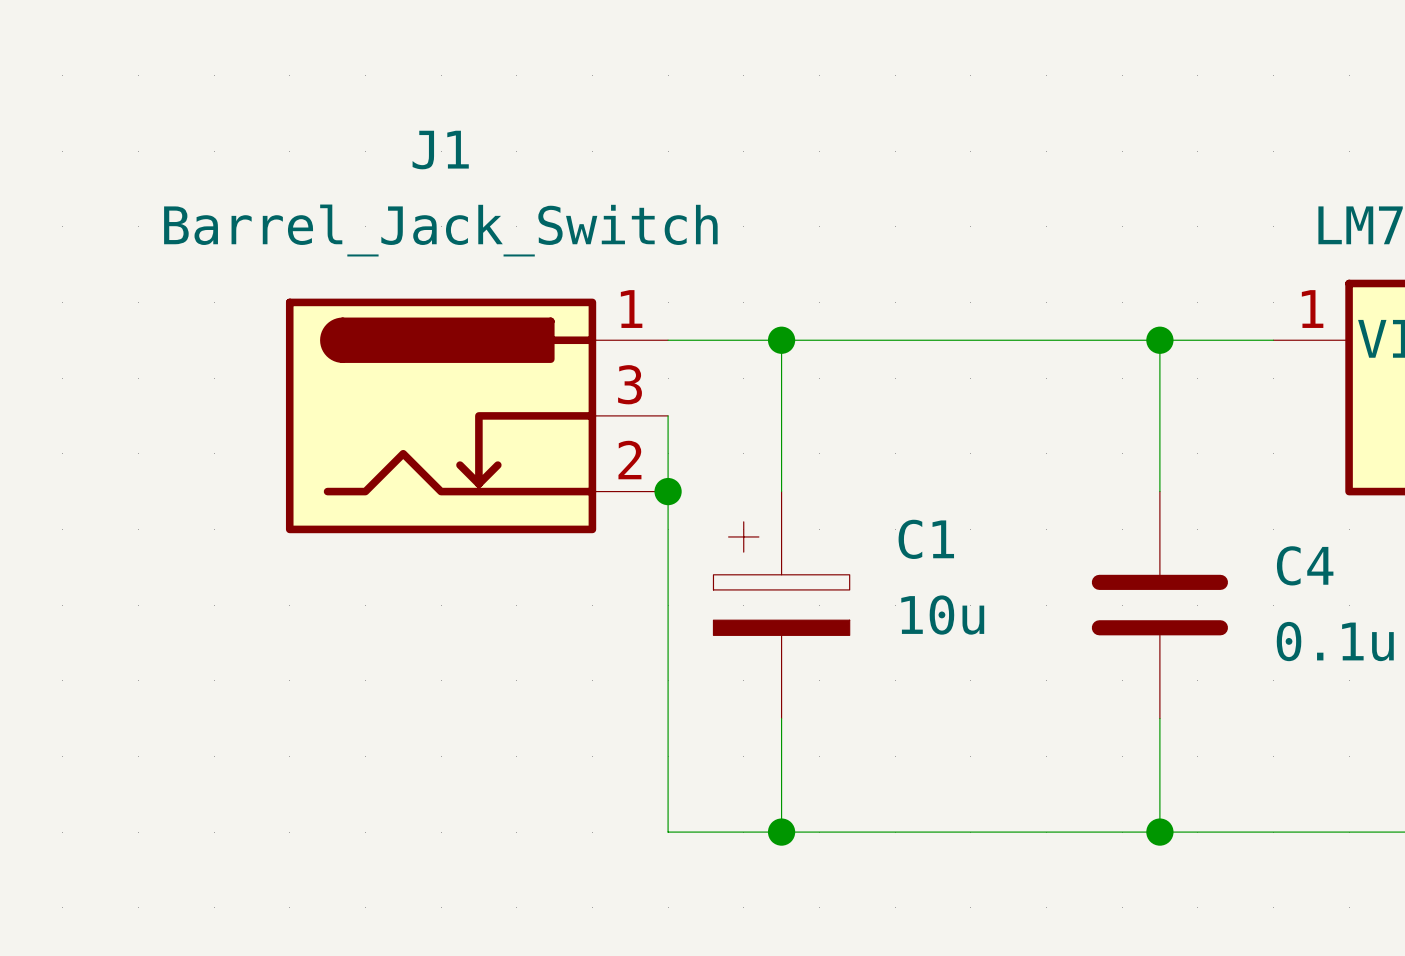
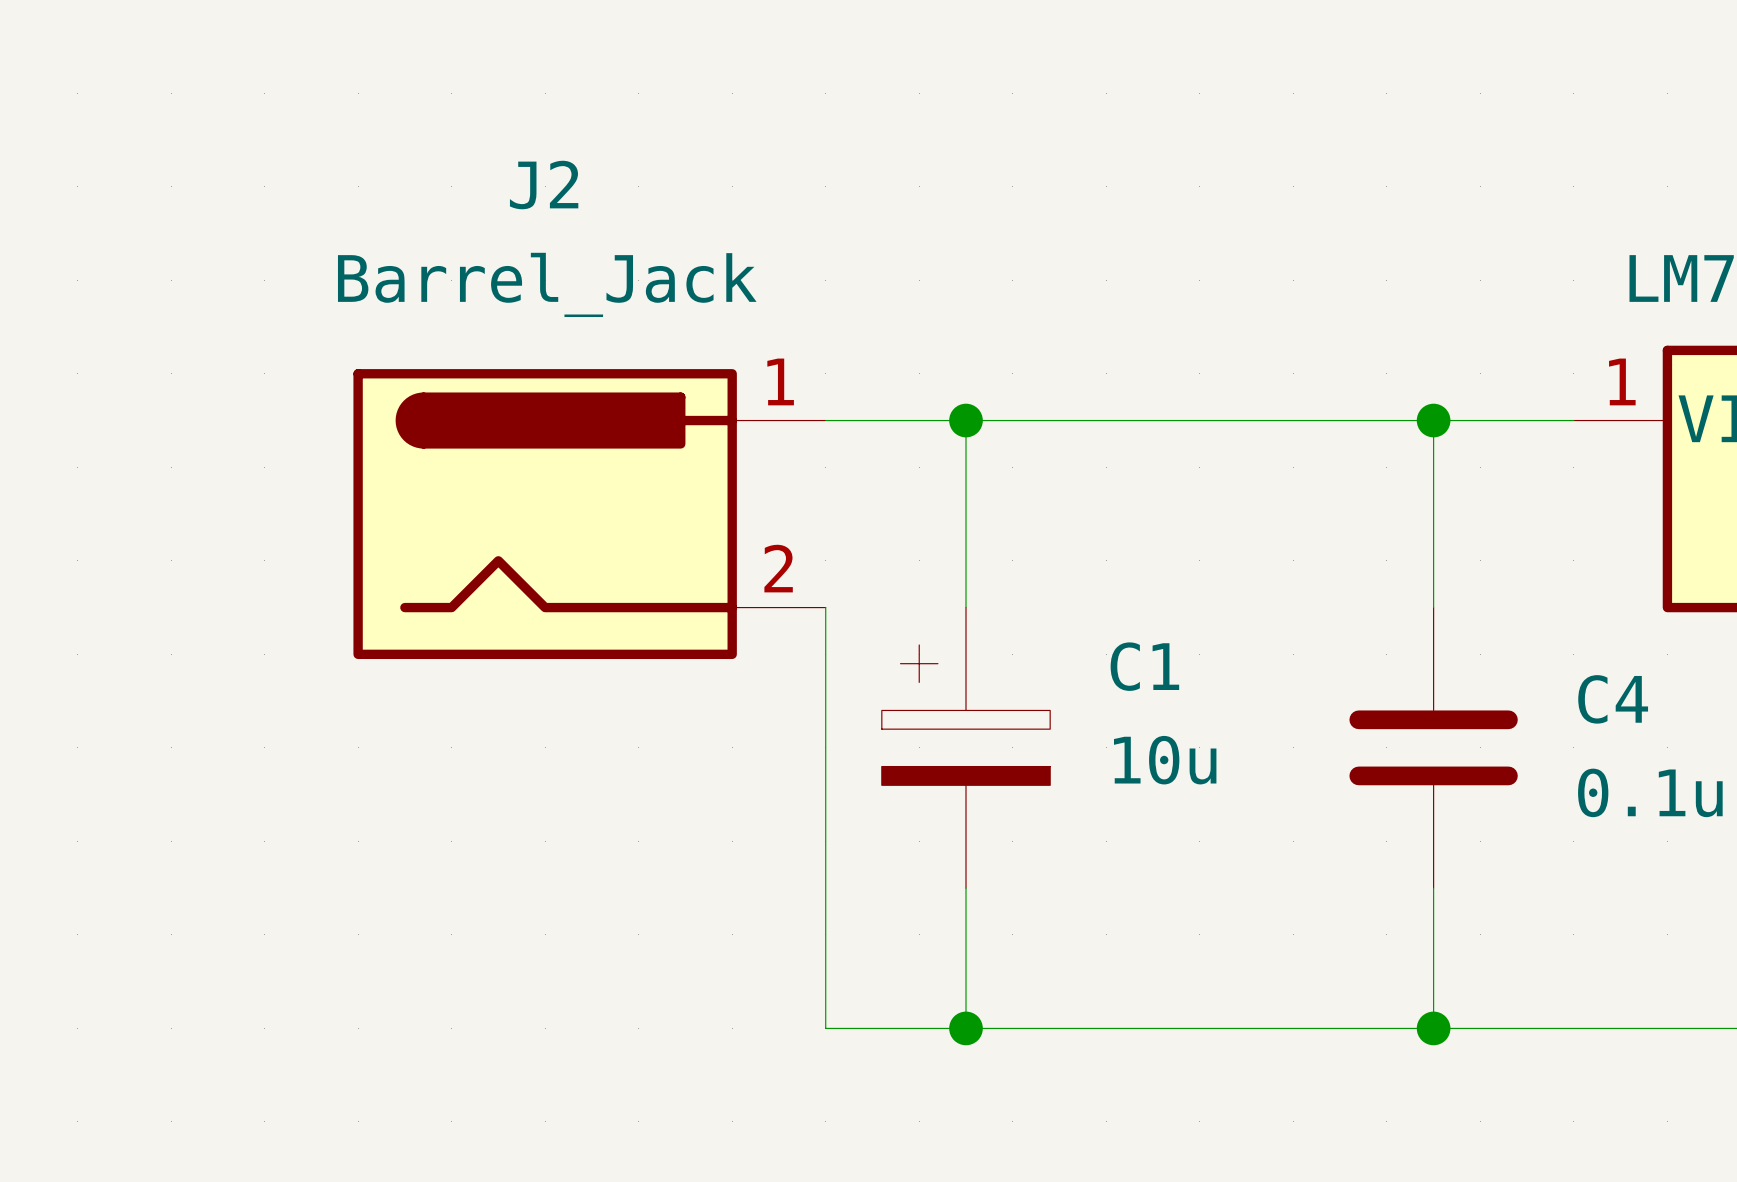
J1: Barrel_Jack_Switch (477, 415) -> none
J2: none -> Barrel_Jack (589, 514)
wire: (668, 415) (668, 491) -> none
junction: (668, 491) -> none

